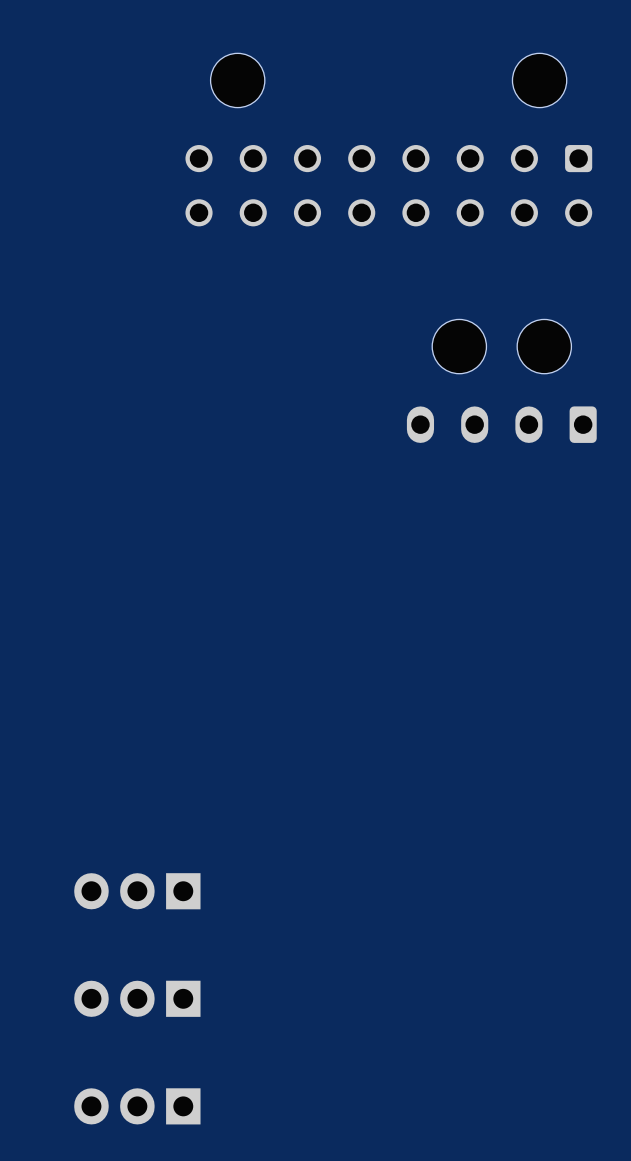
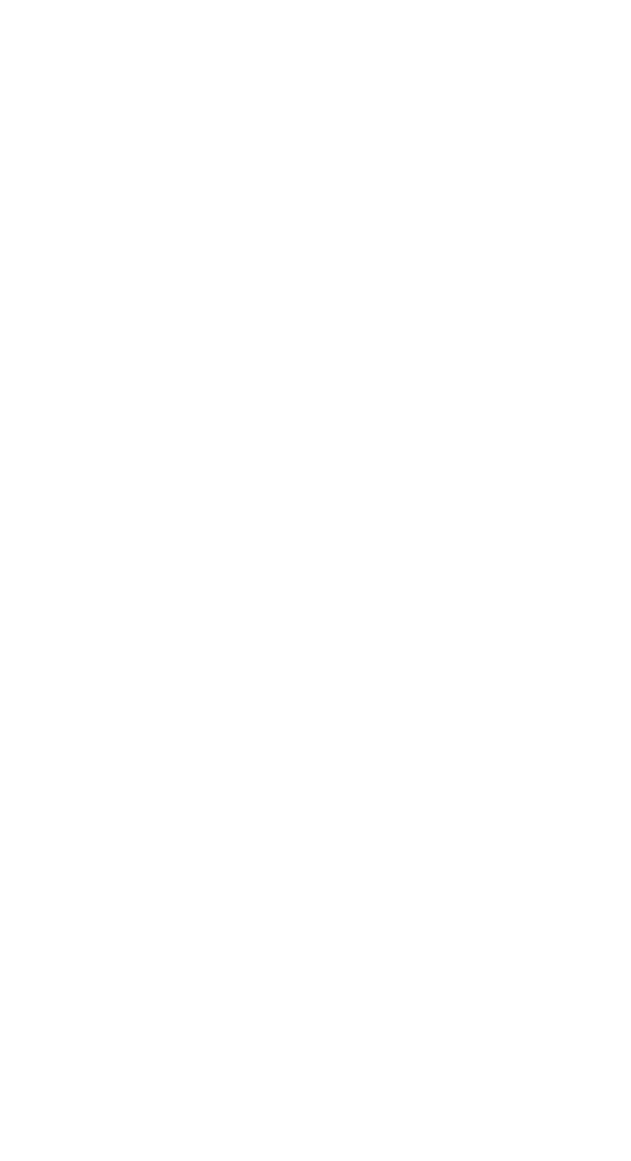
part: (388, 139) -> none
part: (501, 381) -> none
part: (137, 891) -> none
part: (137, 998) -> none
part: (137, 1106) -> none

